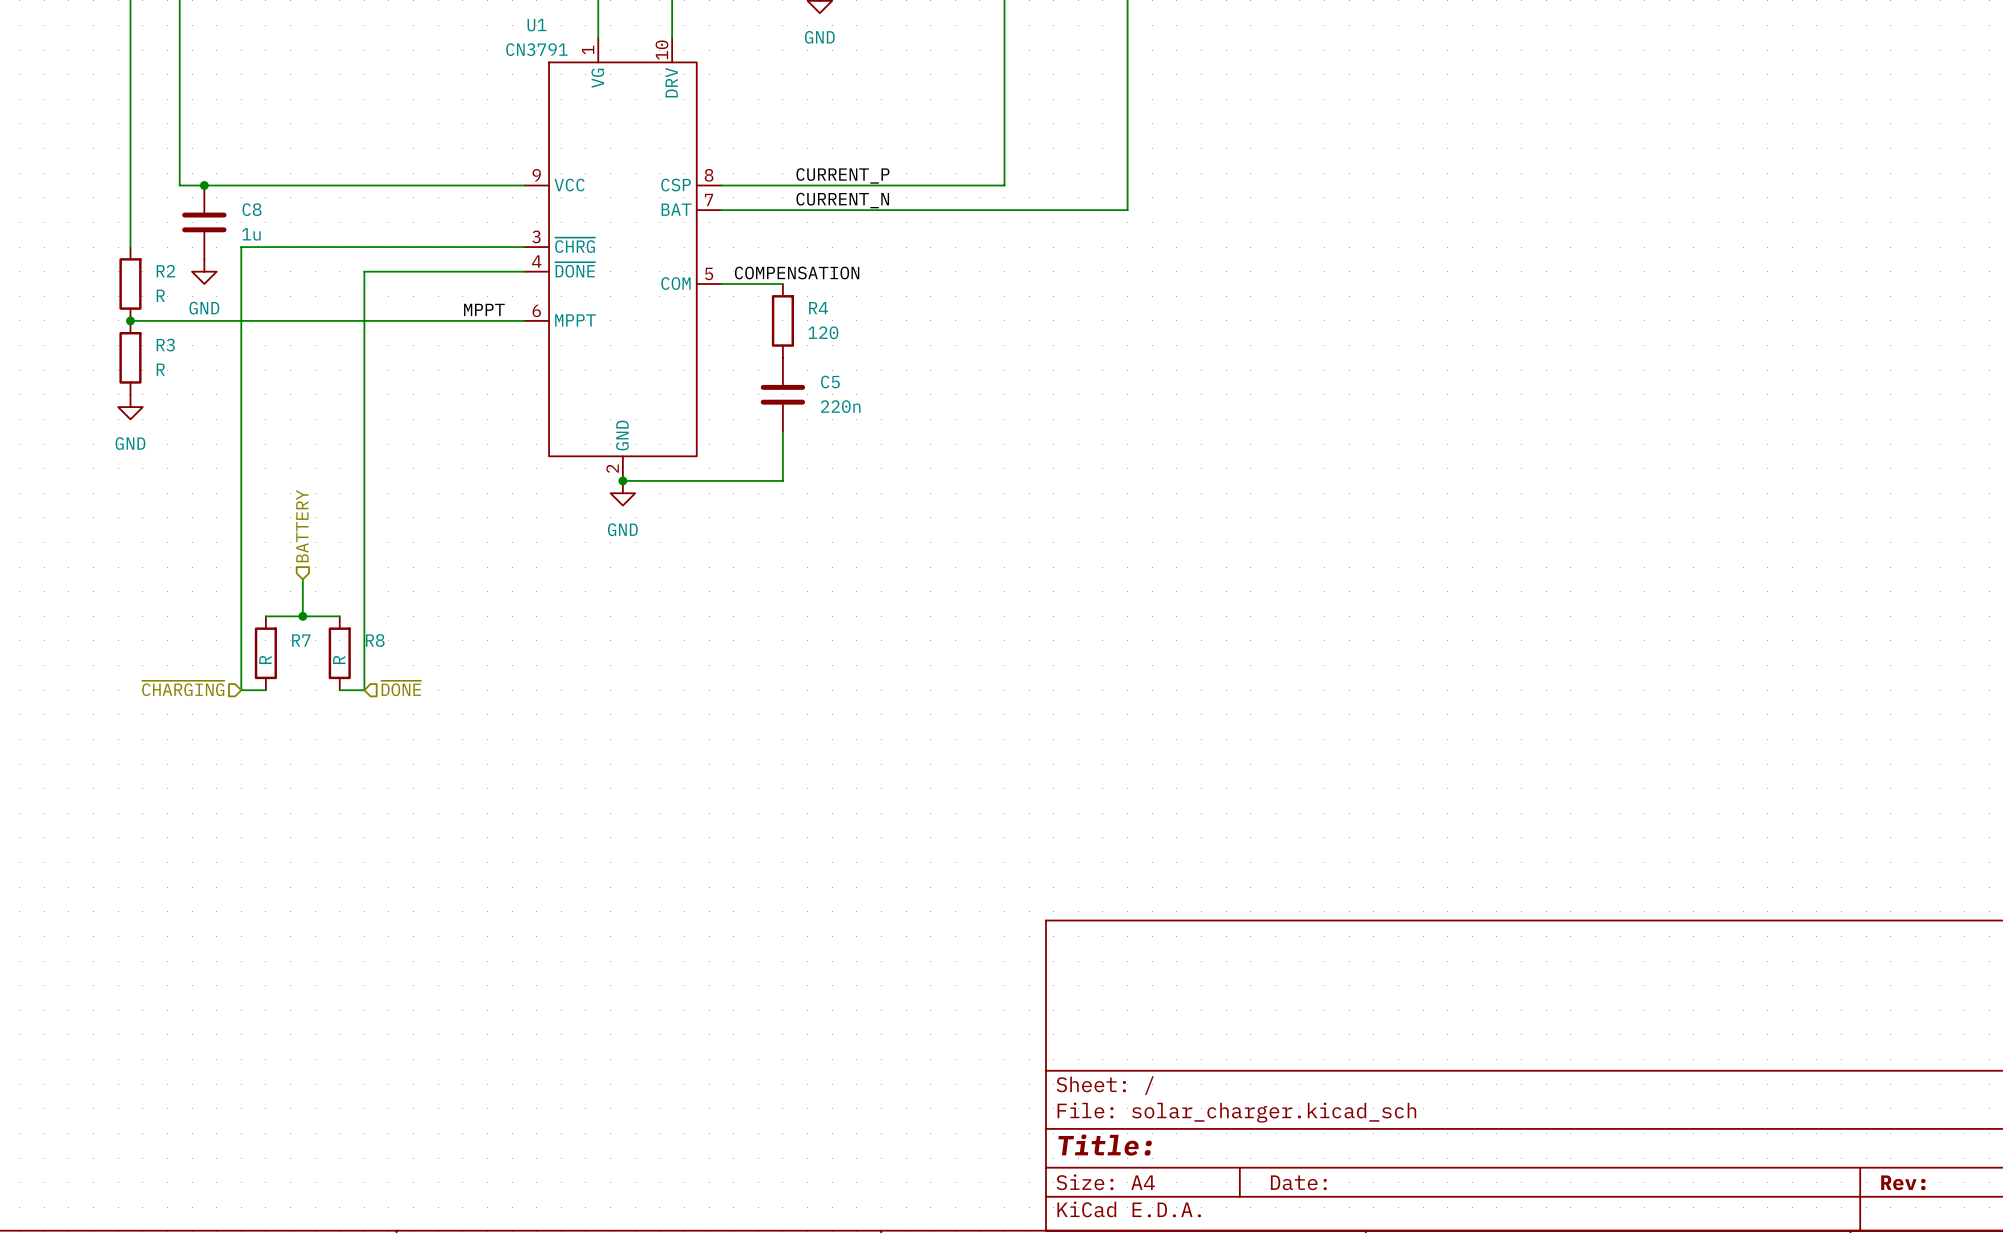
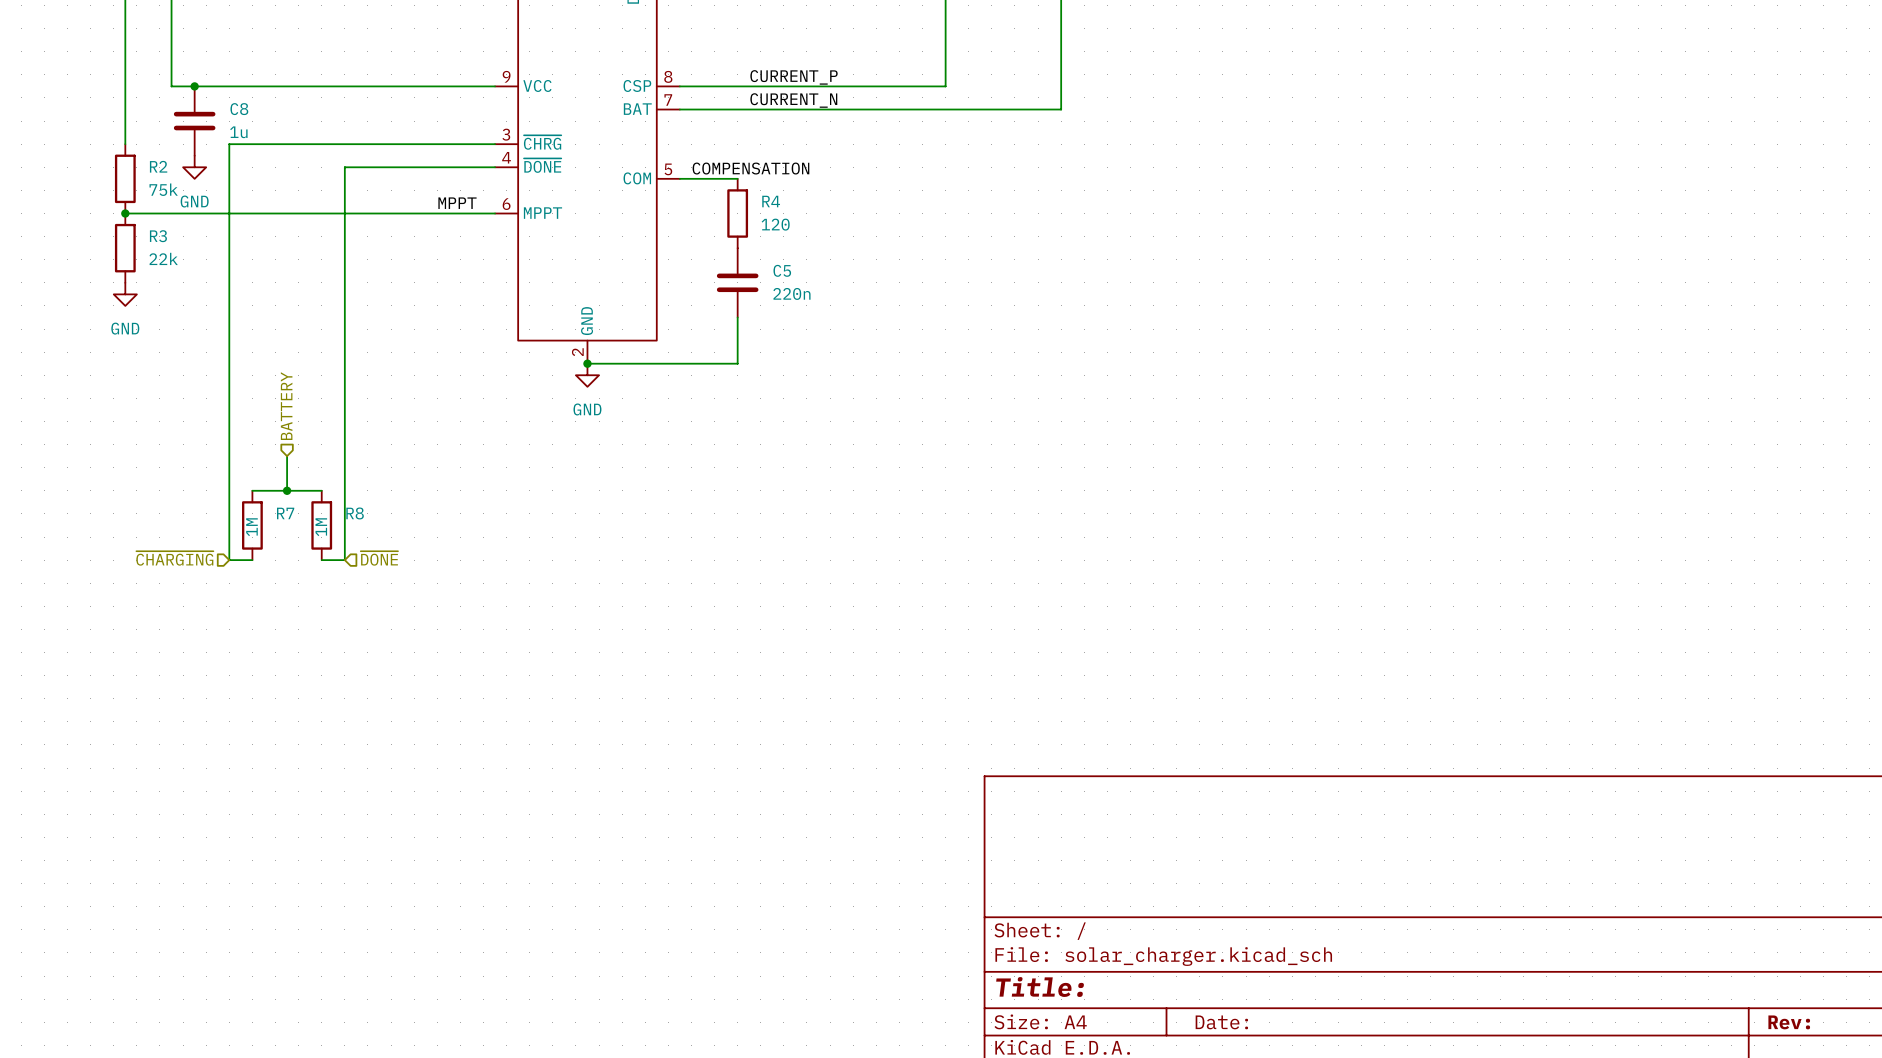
R2 value: R (160, 295) -> 75k (163, 189)
R3 value: R (160, 369) -> 22k (163, 258)
R7 value: R (265, 659) -> 1M (251, 527)
R8 value: R (339, 659) -> 1M (321, 527)

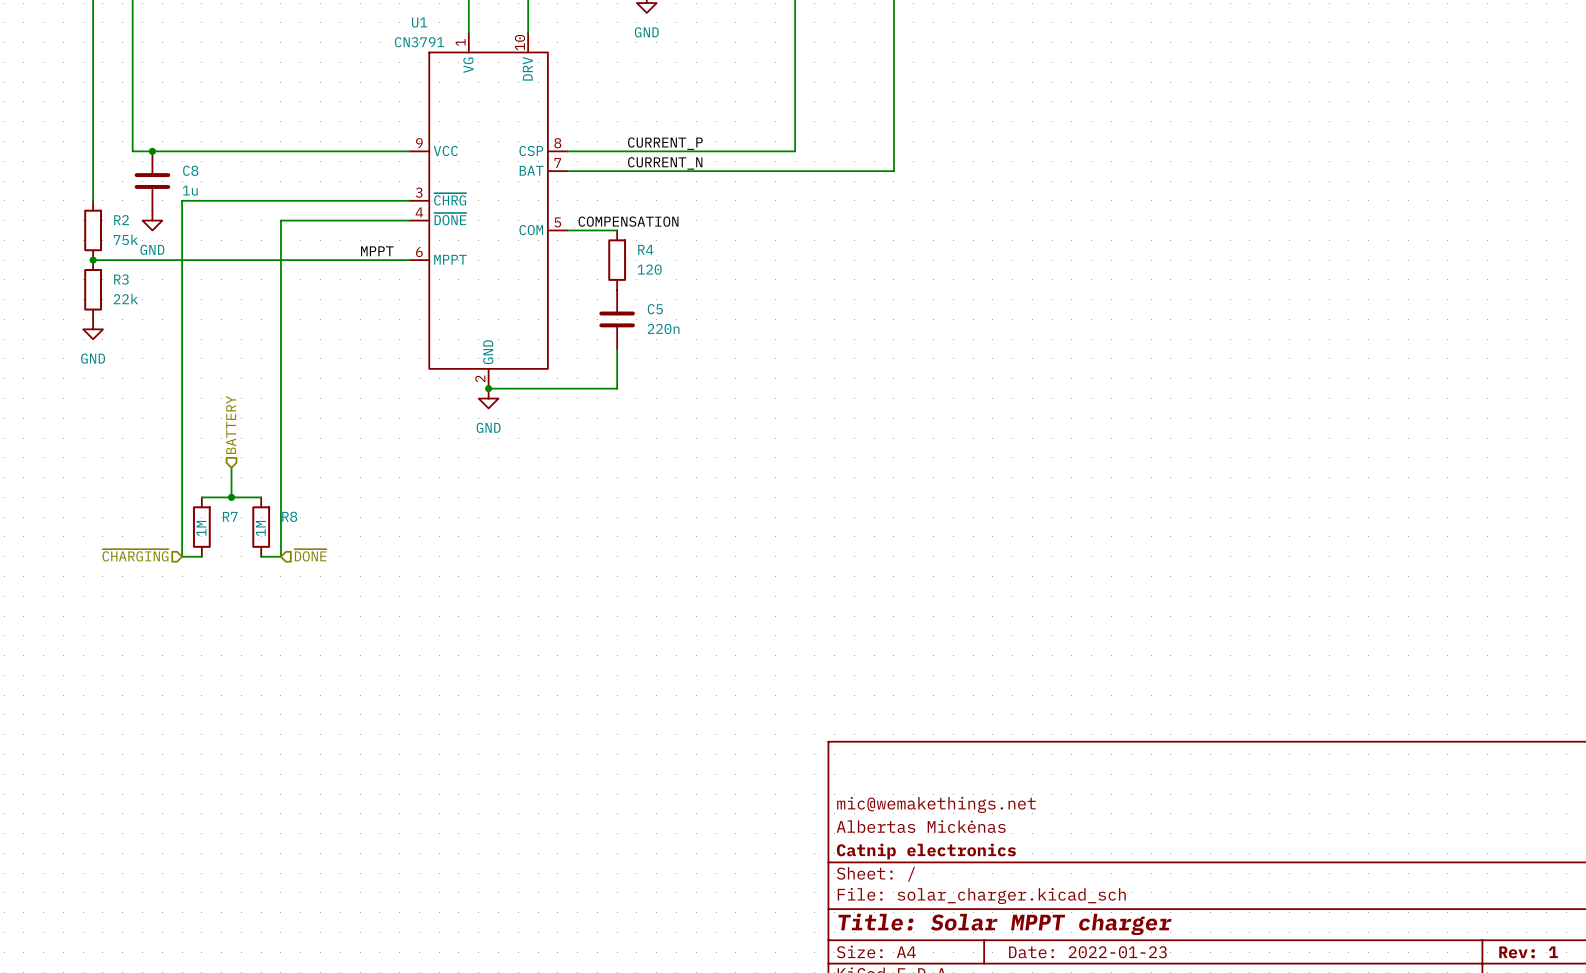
title block: none -> mic@wemakethings.net (936, 804)
title block: none -> Albertas Mickėnas (921, 826)
title block: none -> Catnip electronics (926, 851)
title block: Title: (1040, 987) -> Title: Solar MPPT charger (1004, 924)
title block: Date: (1221, 1022) -> Date: 2022-01-23 (1087, 952)
title block: Rev: (1789, 1022) -> Rev: 1 (1528, 952)

